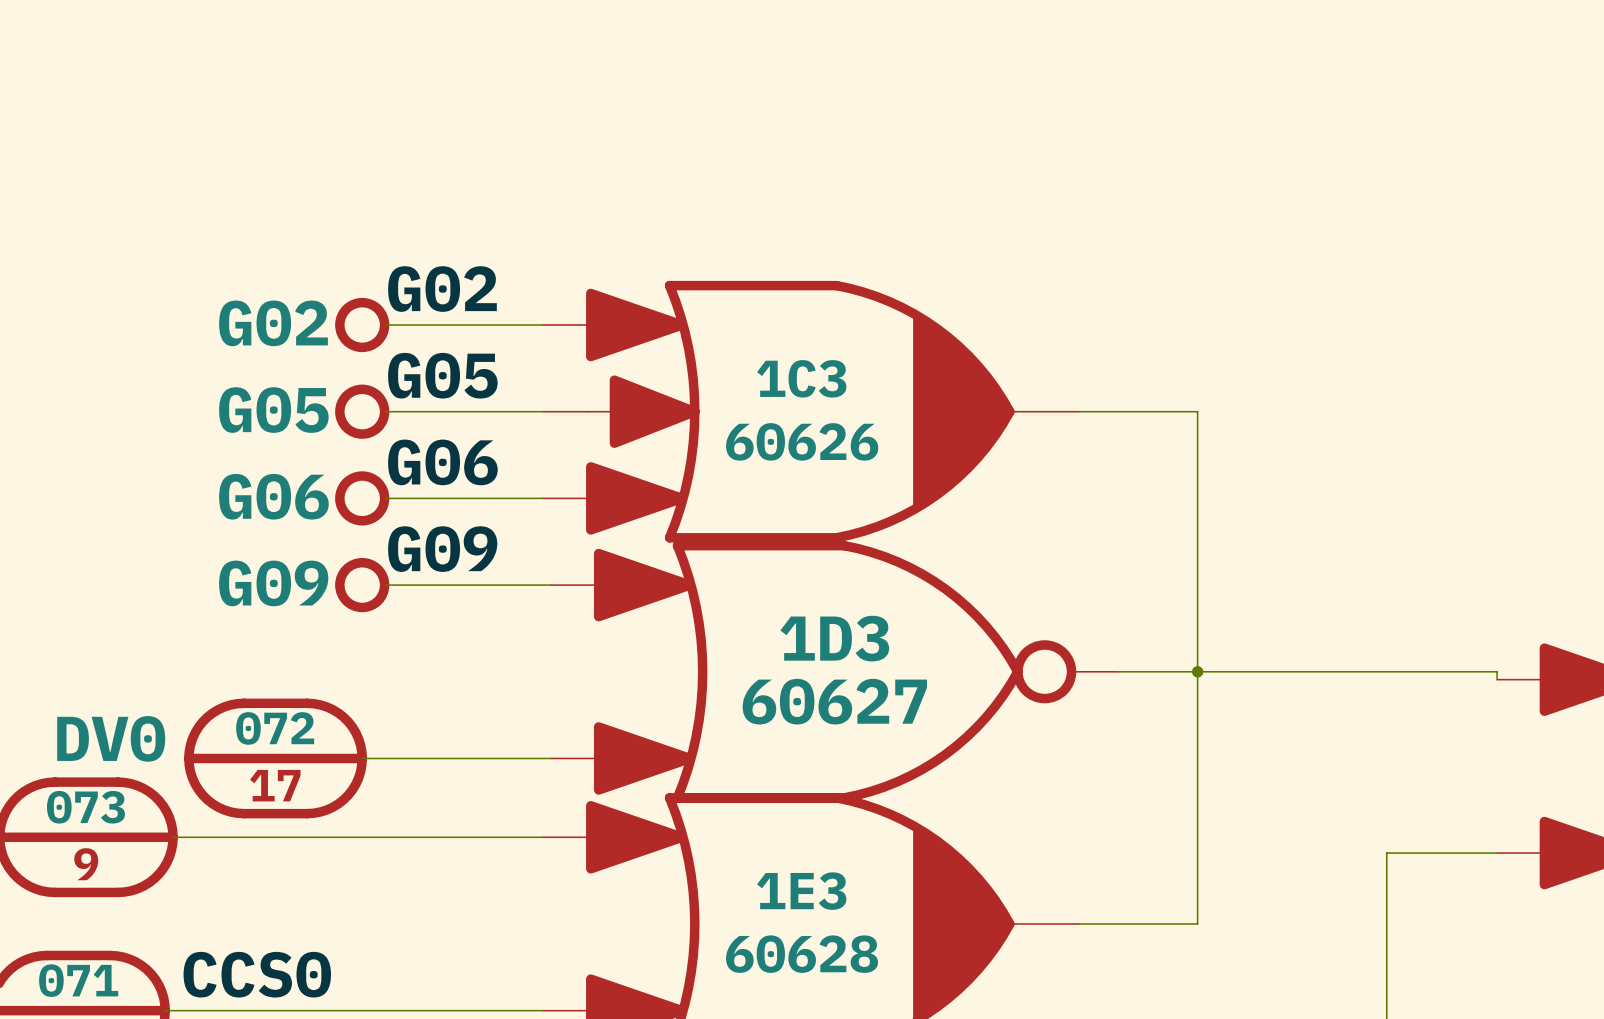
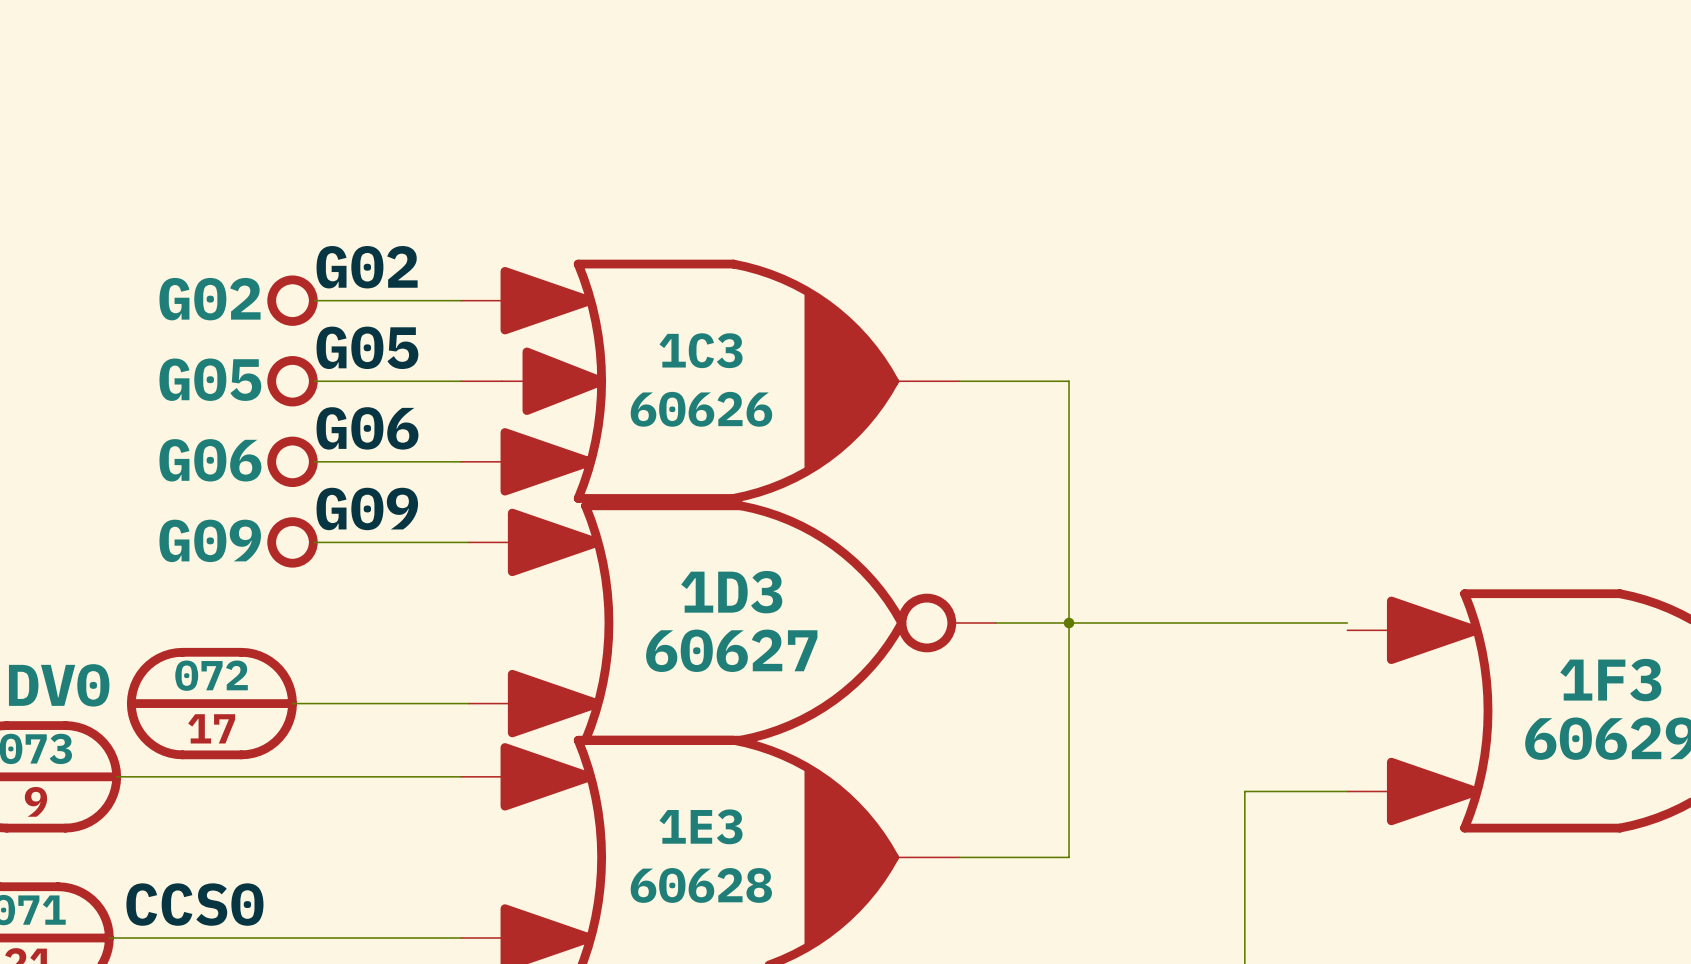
wire: (1497, 671) (1497, 679) -> none

